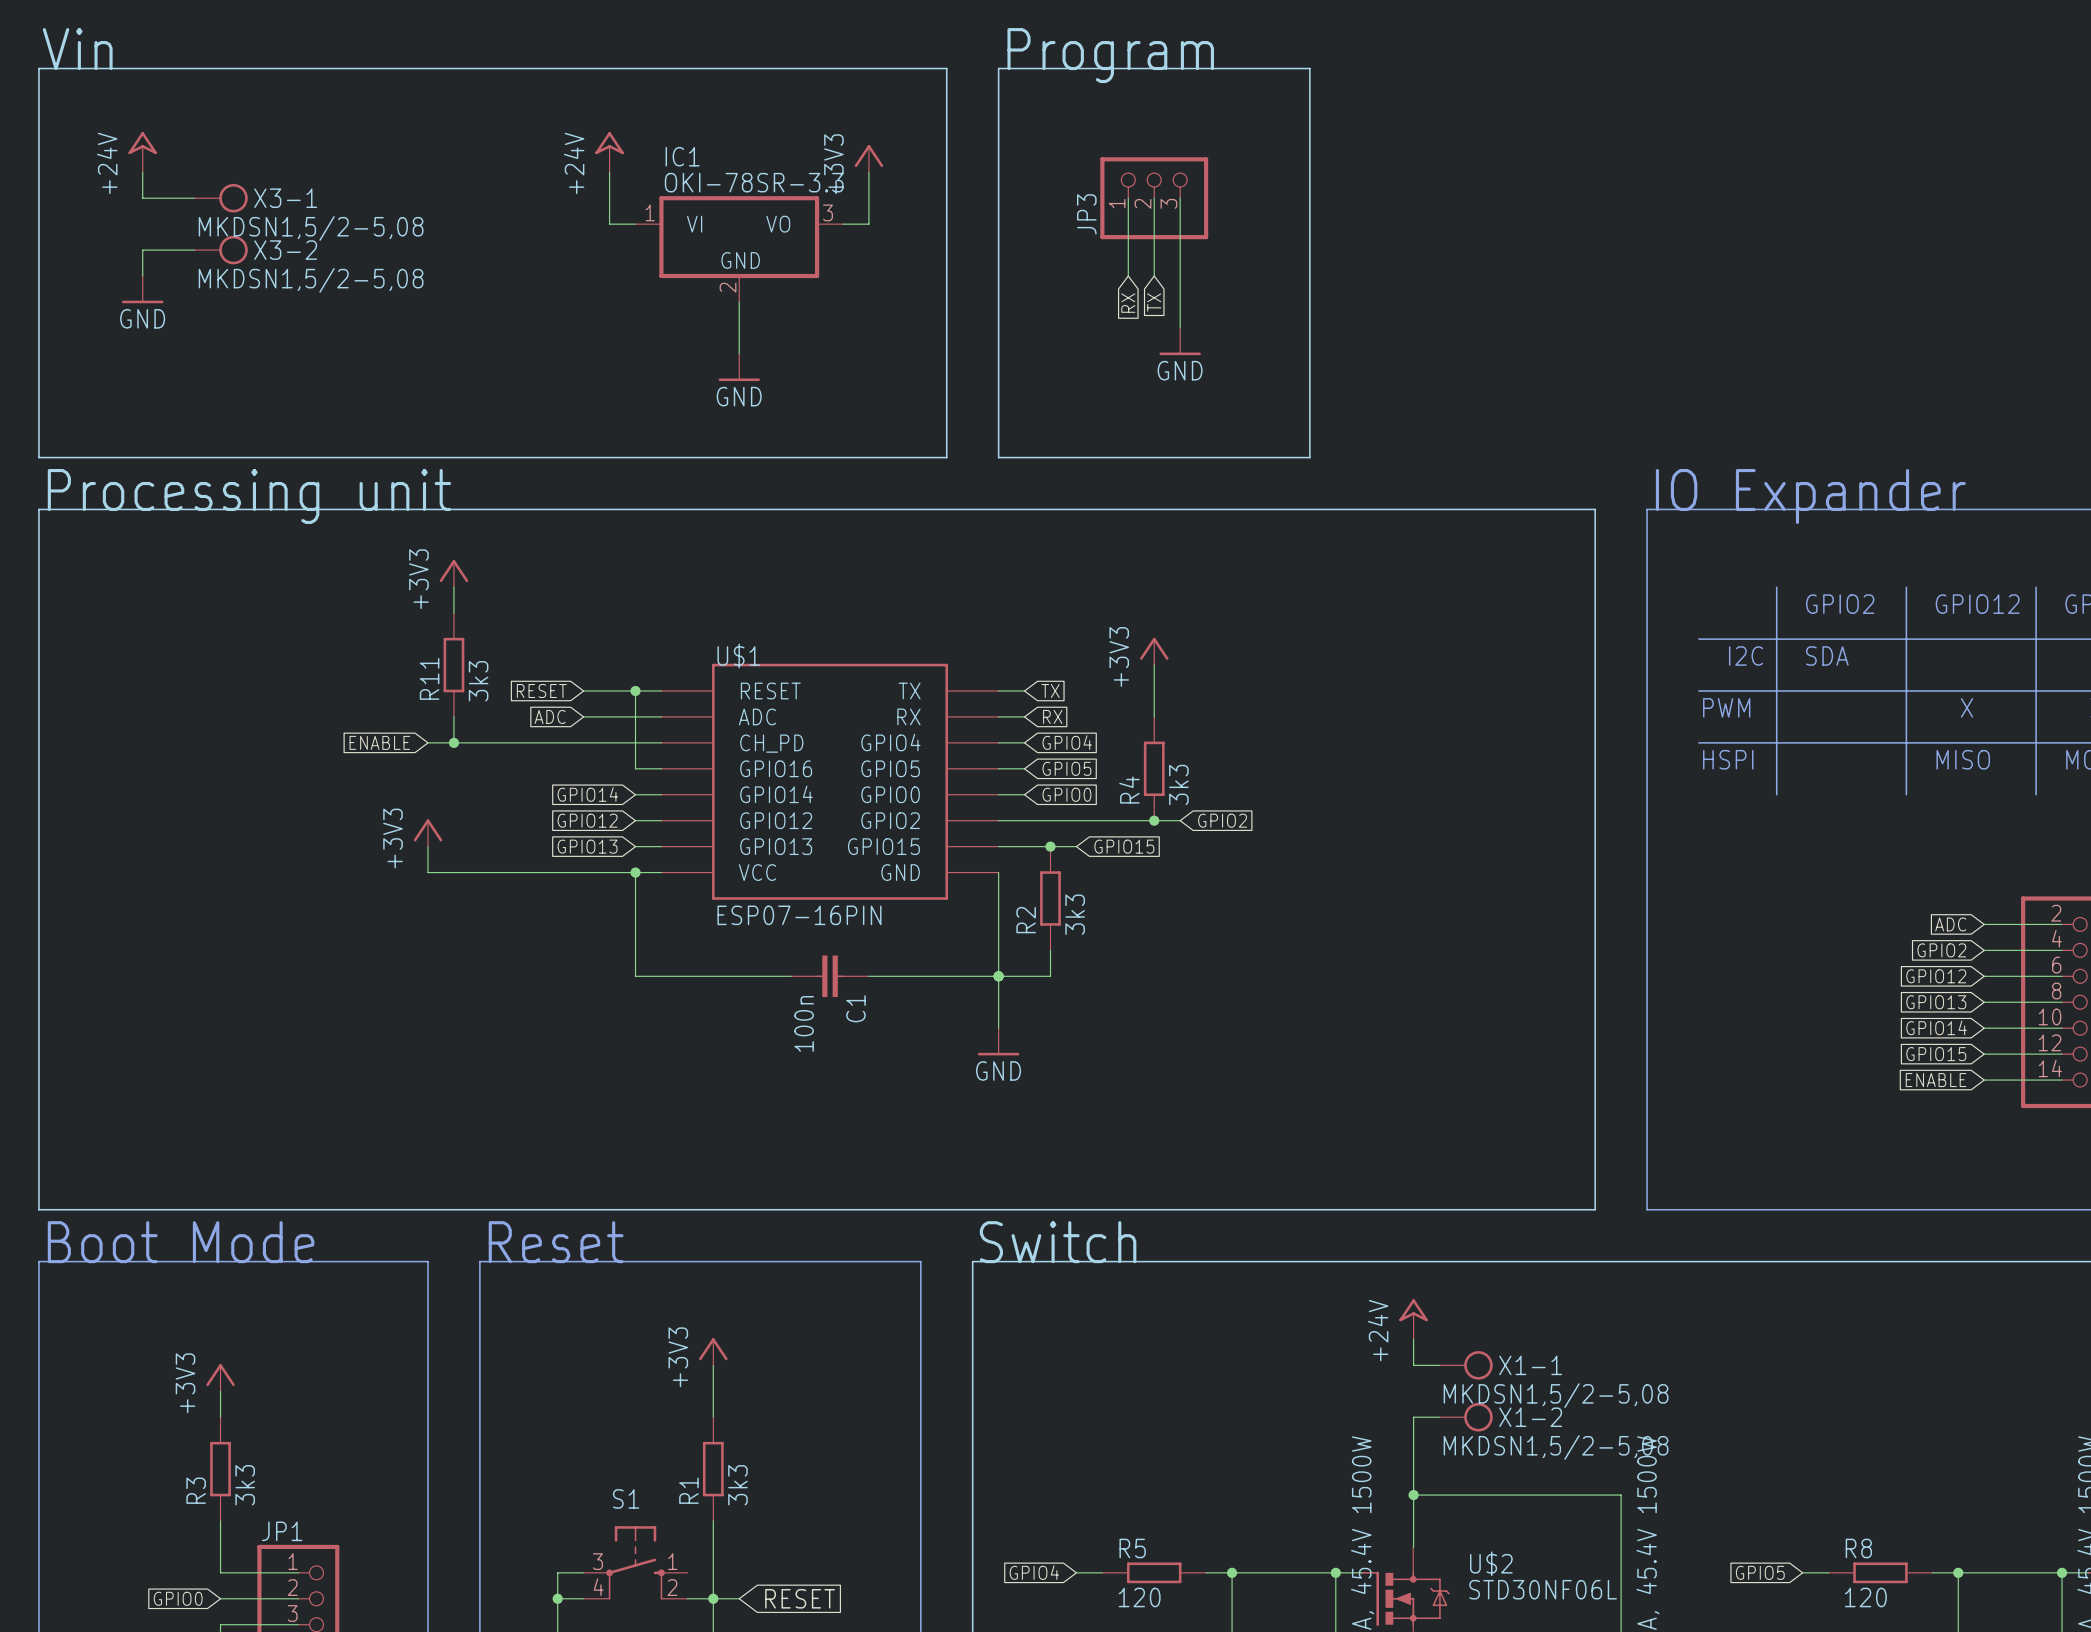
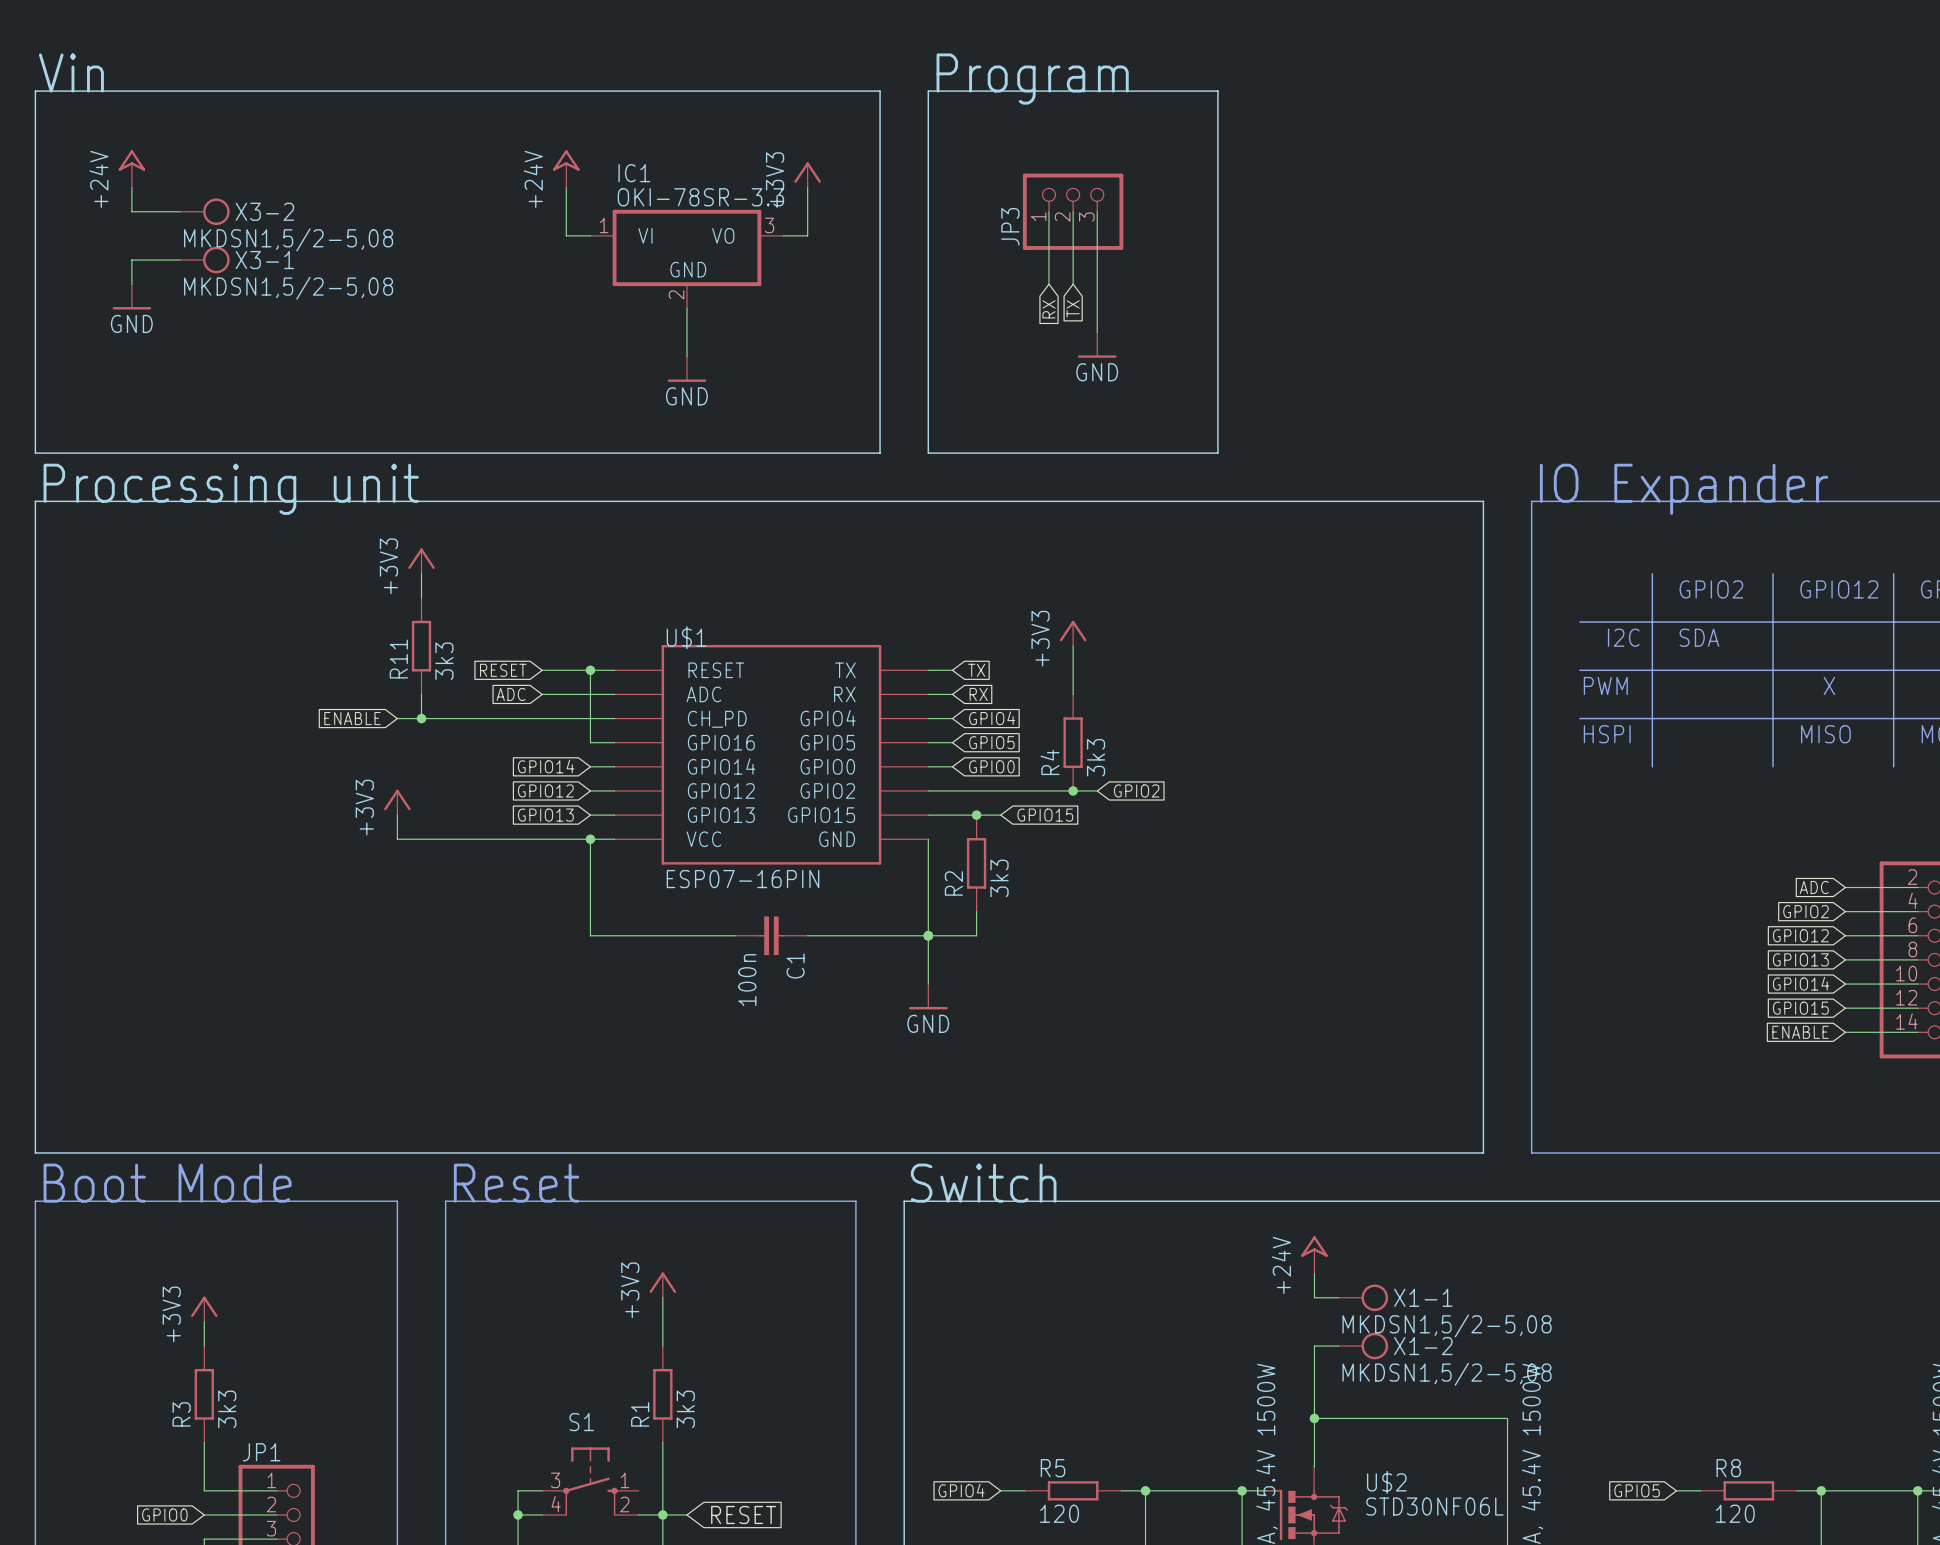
X3-1 name: X3-1 (285, 198) -> X3-2 (264, 211)
X3-2 name: X3-2 (285, 250) -> X3-1 (264, 260)

